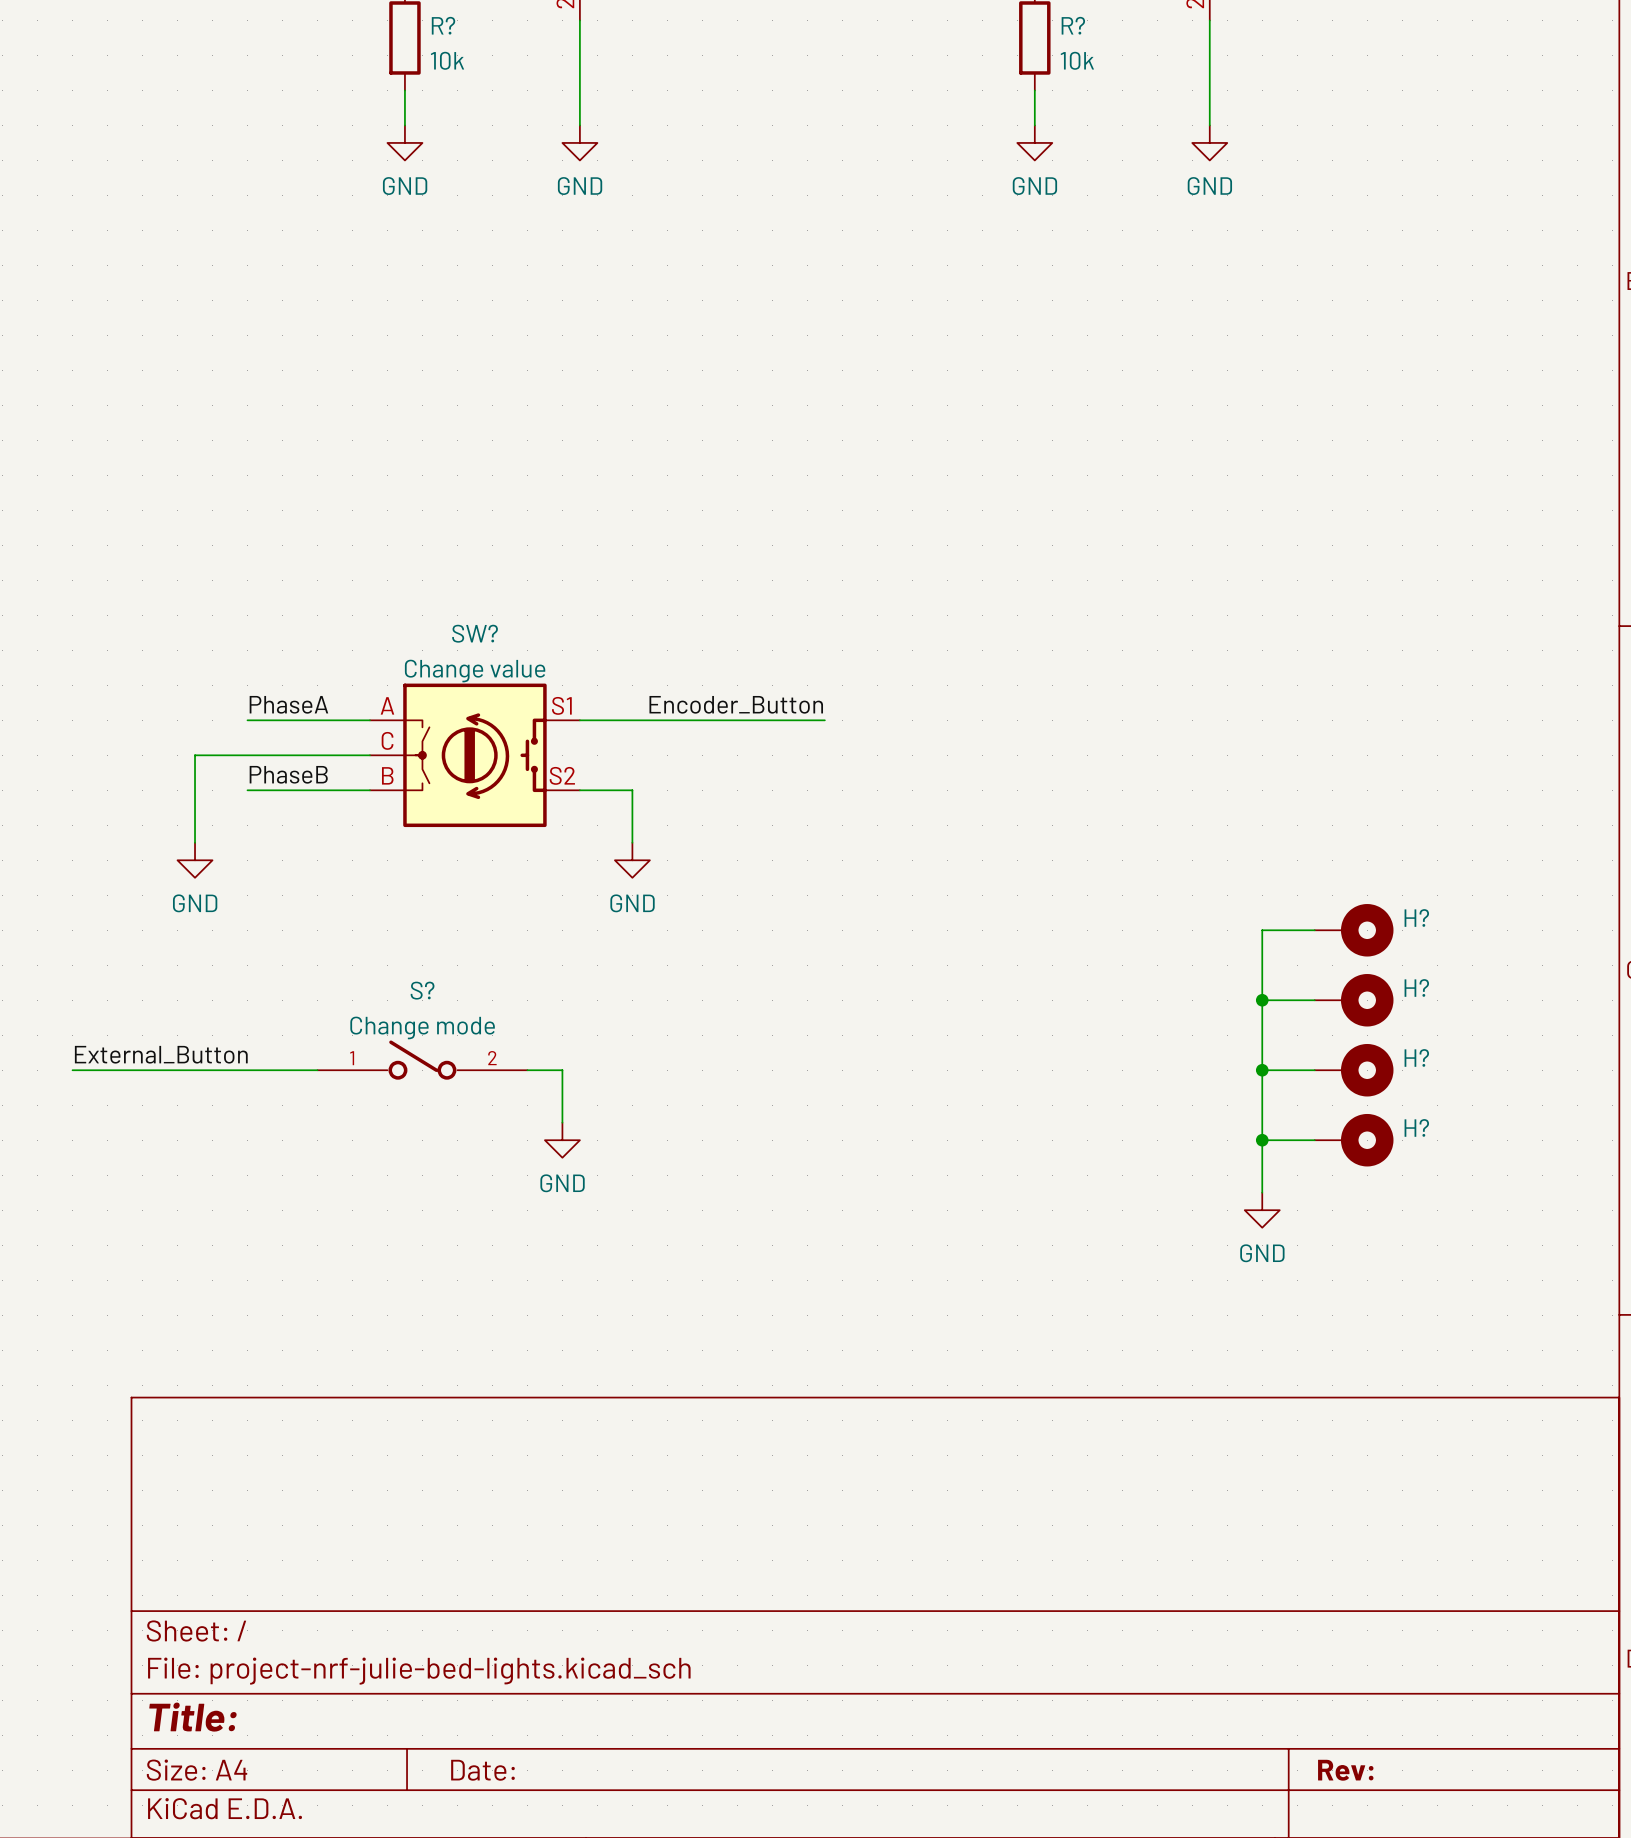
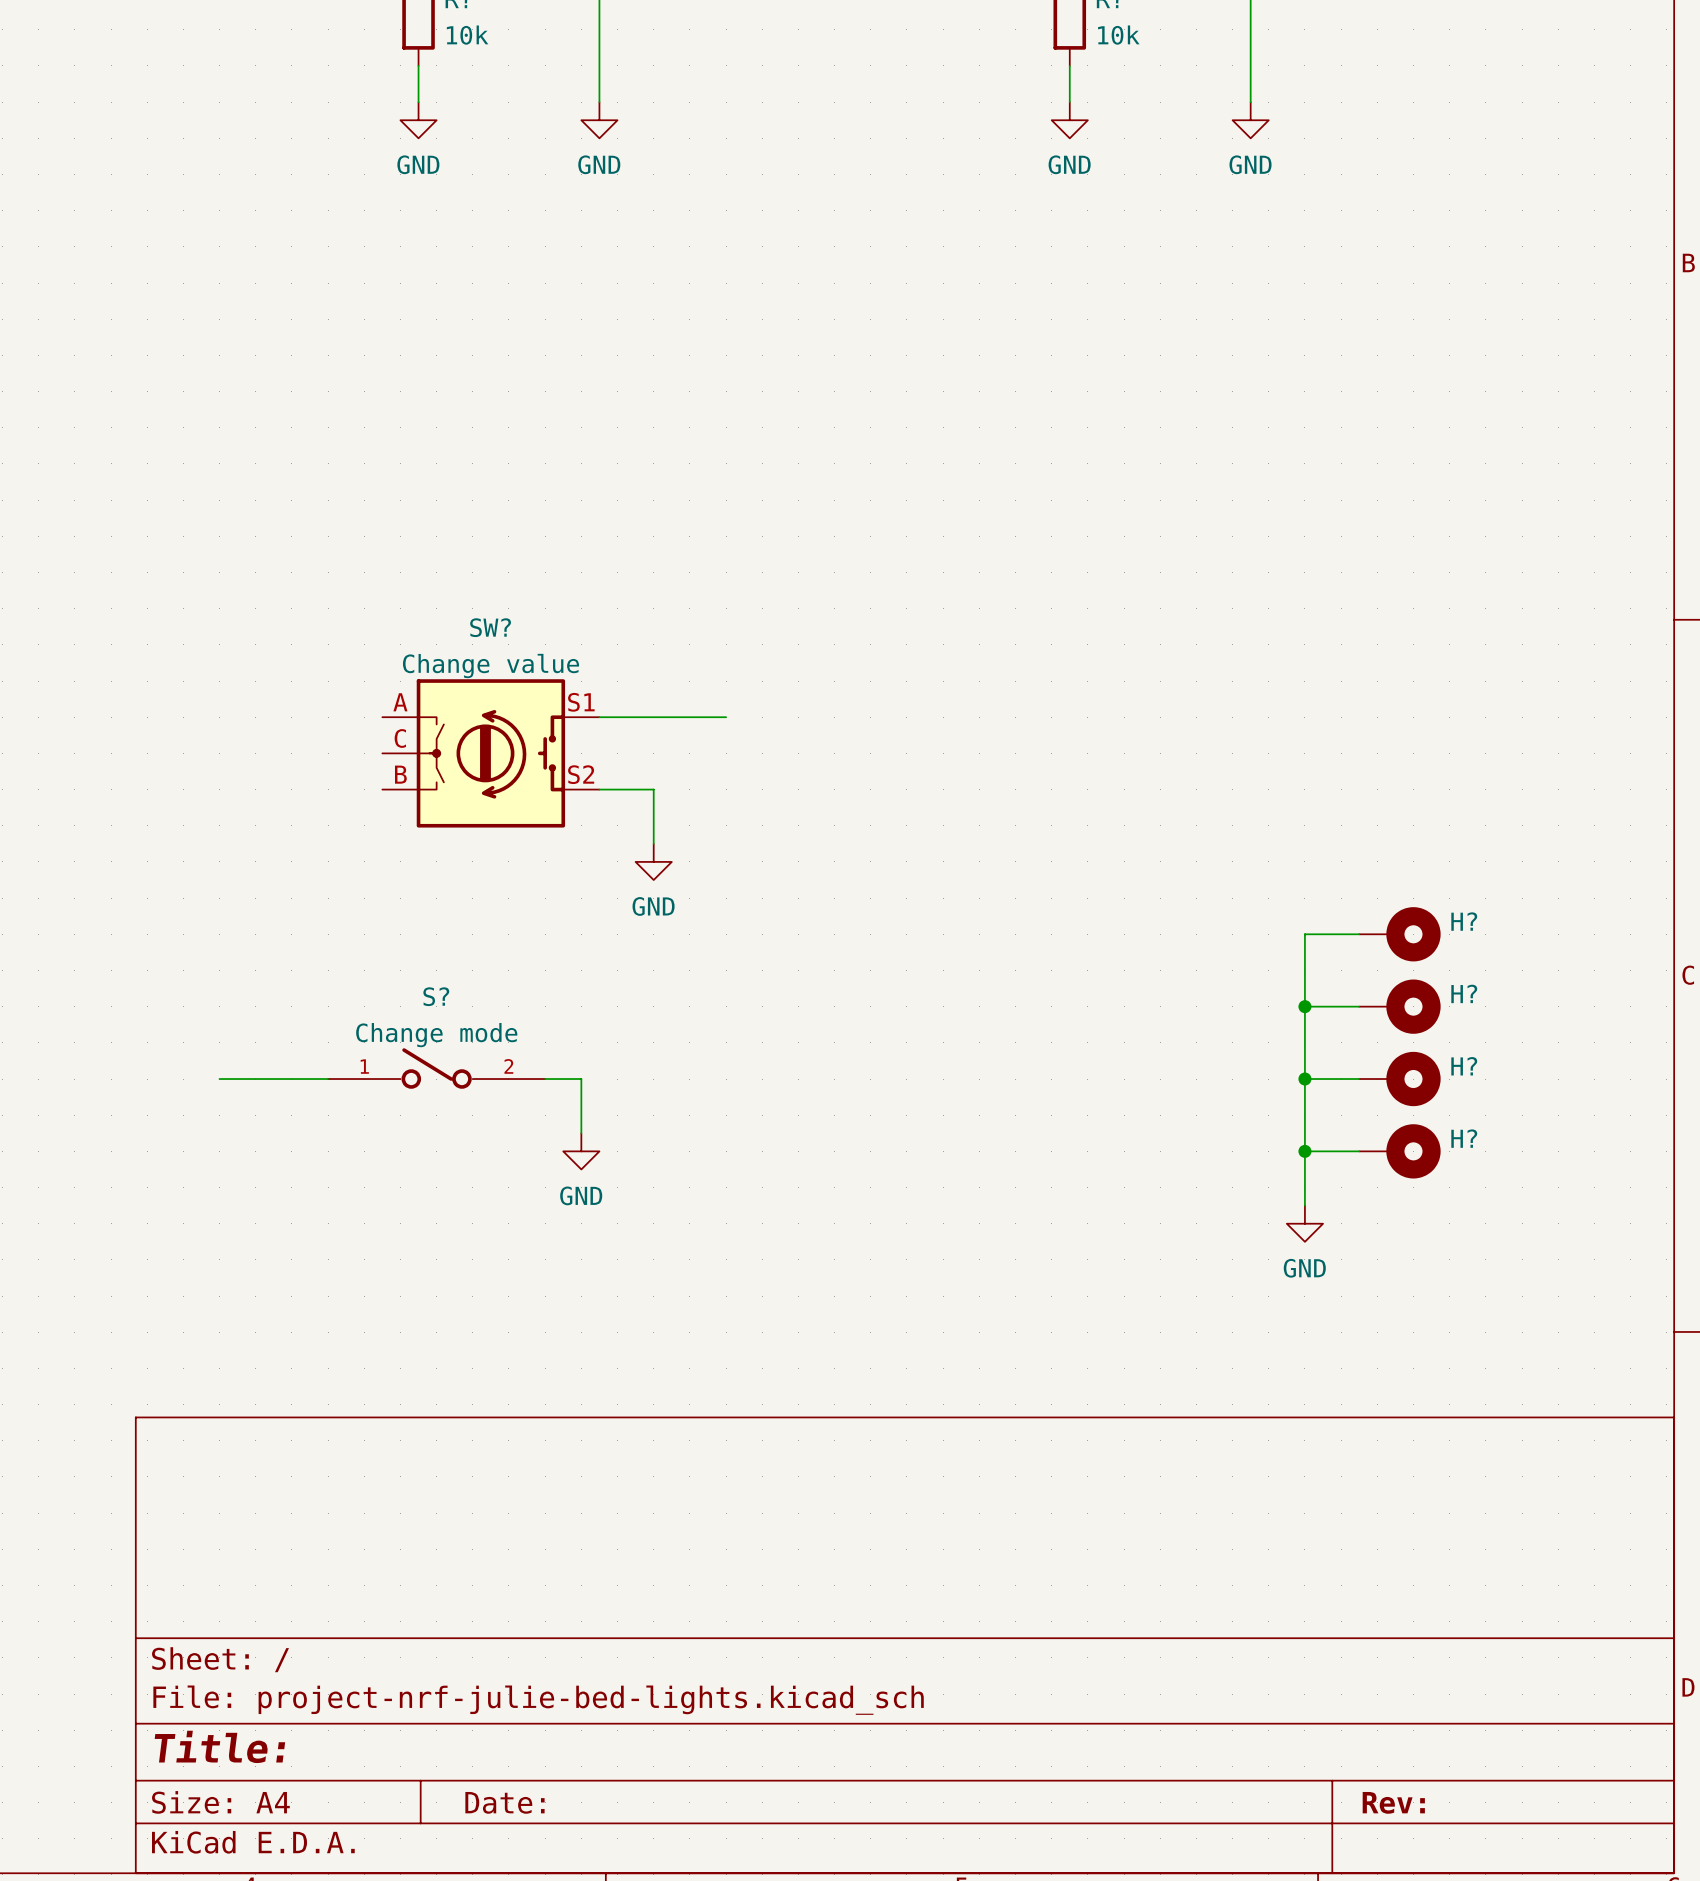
label: PhaseA (288, 704) -> none
label: Encoder_Button (736, 704) -> none
wire: (247, 720) (369, 720) -> none
wire: (702, 720) (824, 720) -> none
wire: (369, 755) (195, 755) (195, 842) -> none
label: PhaseB (288, 774) -> none
wire: (247, 790) (369, 790) -> none
power symbol: GND (195, 860) -> none
label: External_Button (161, 1054) -> none
wire: (72, 1070) (212, 1070) -> none

